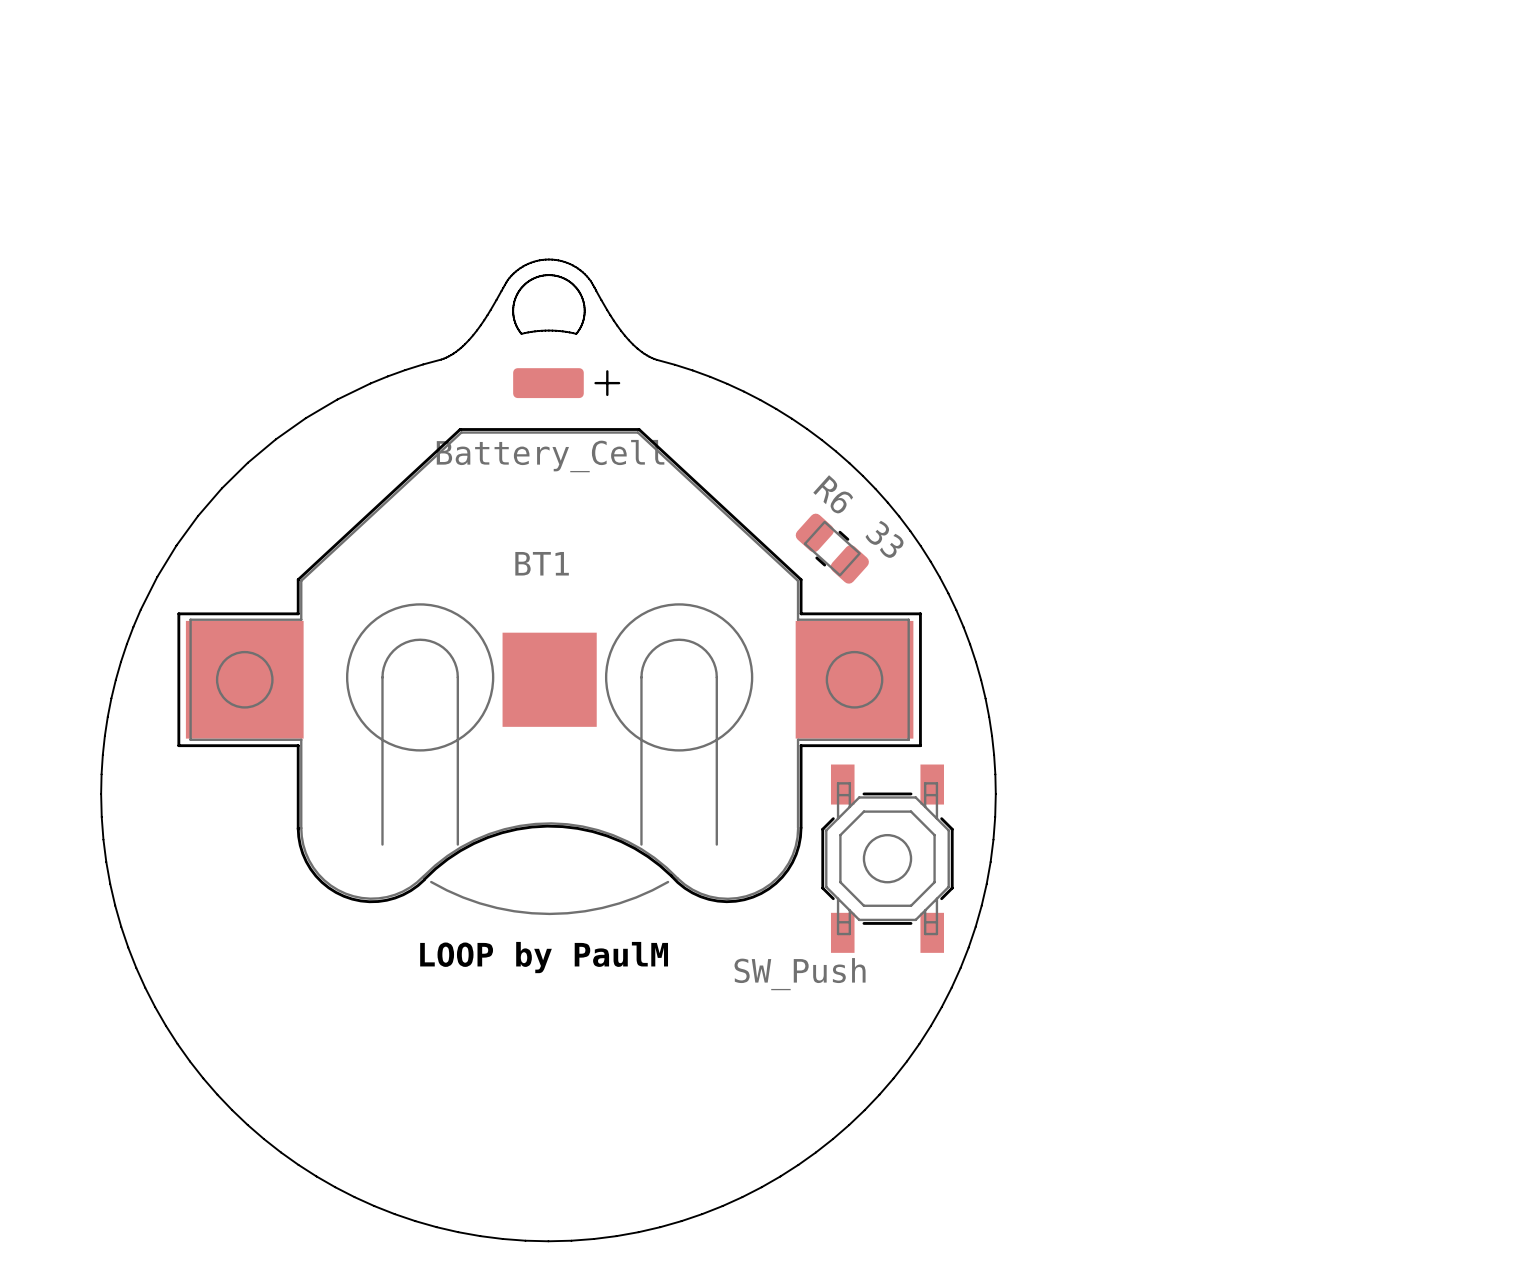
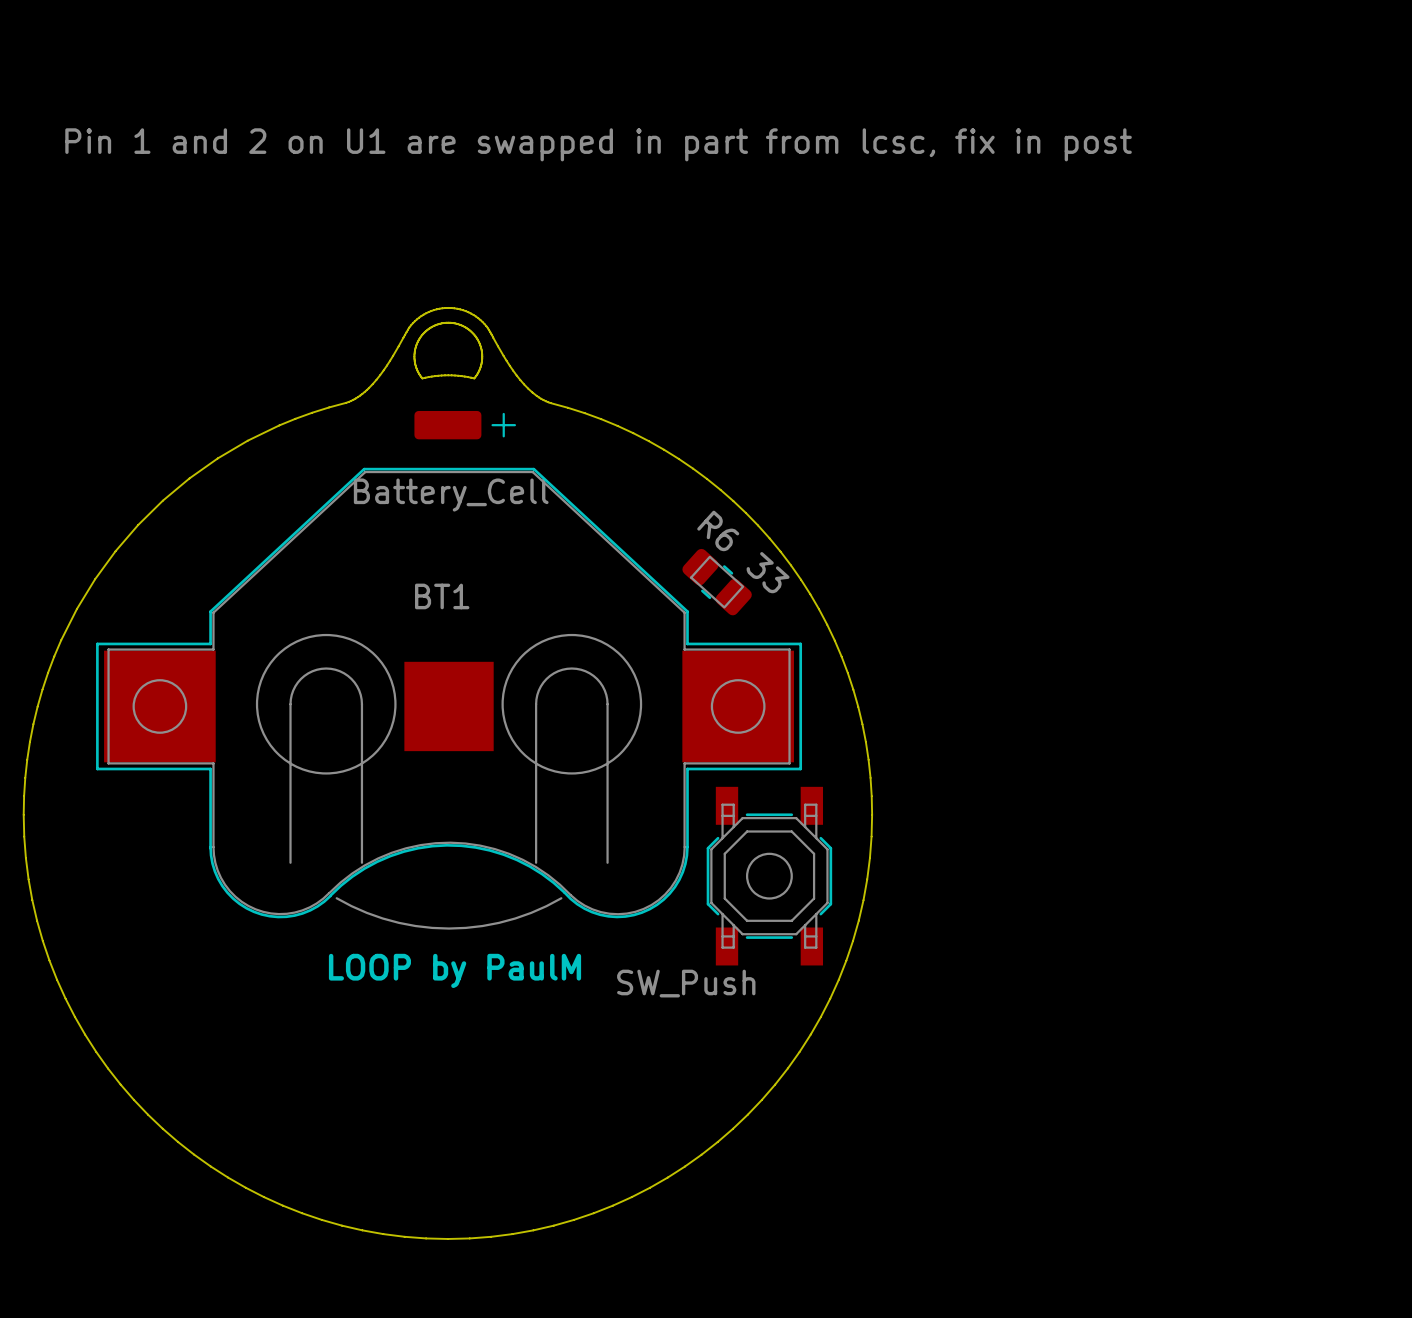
text: none -> Pin 1 and 2 on U1 are swapped in part from lcsc, fix in post (598, 144)

